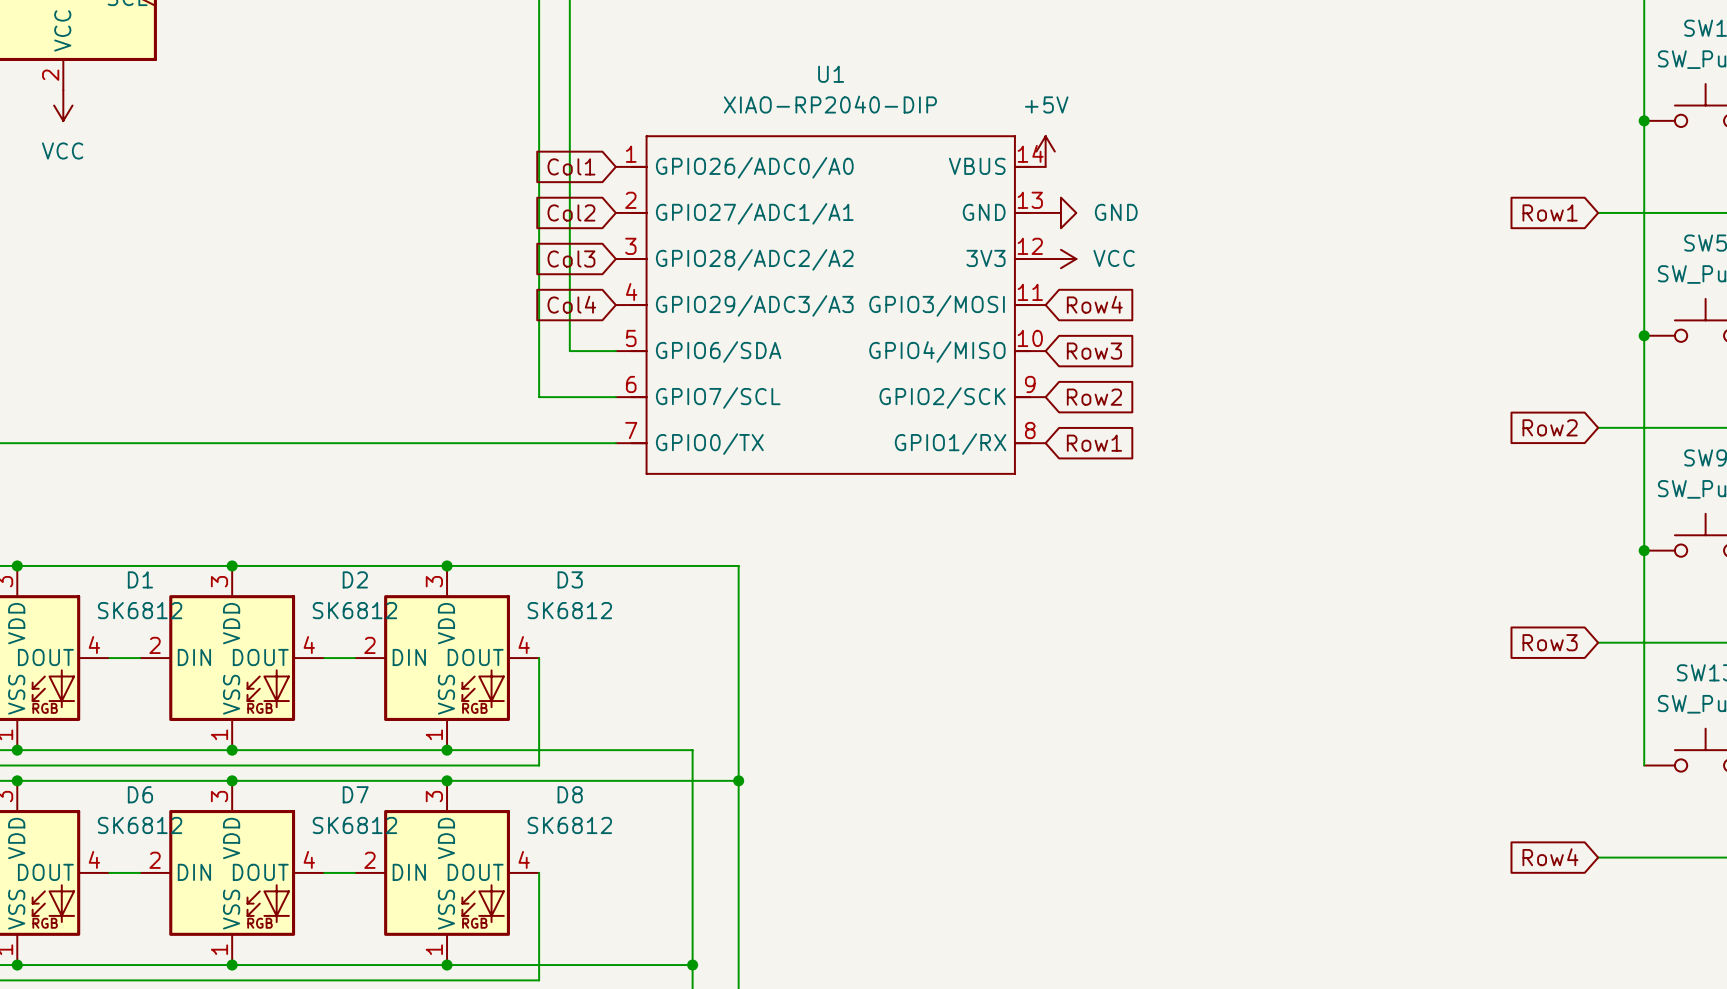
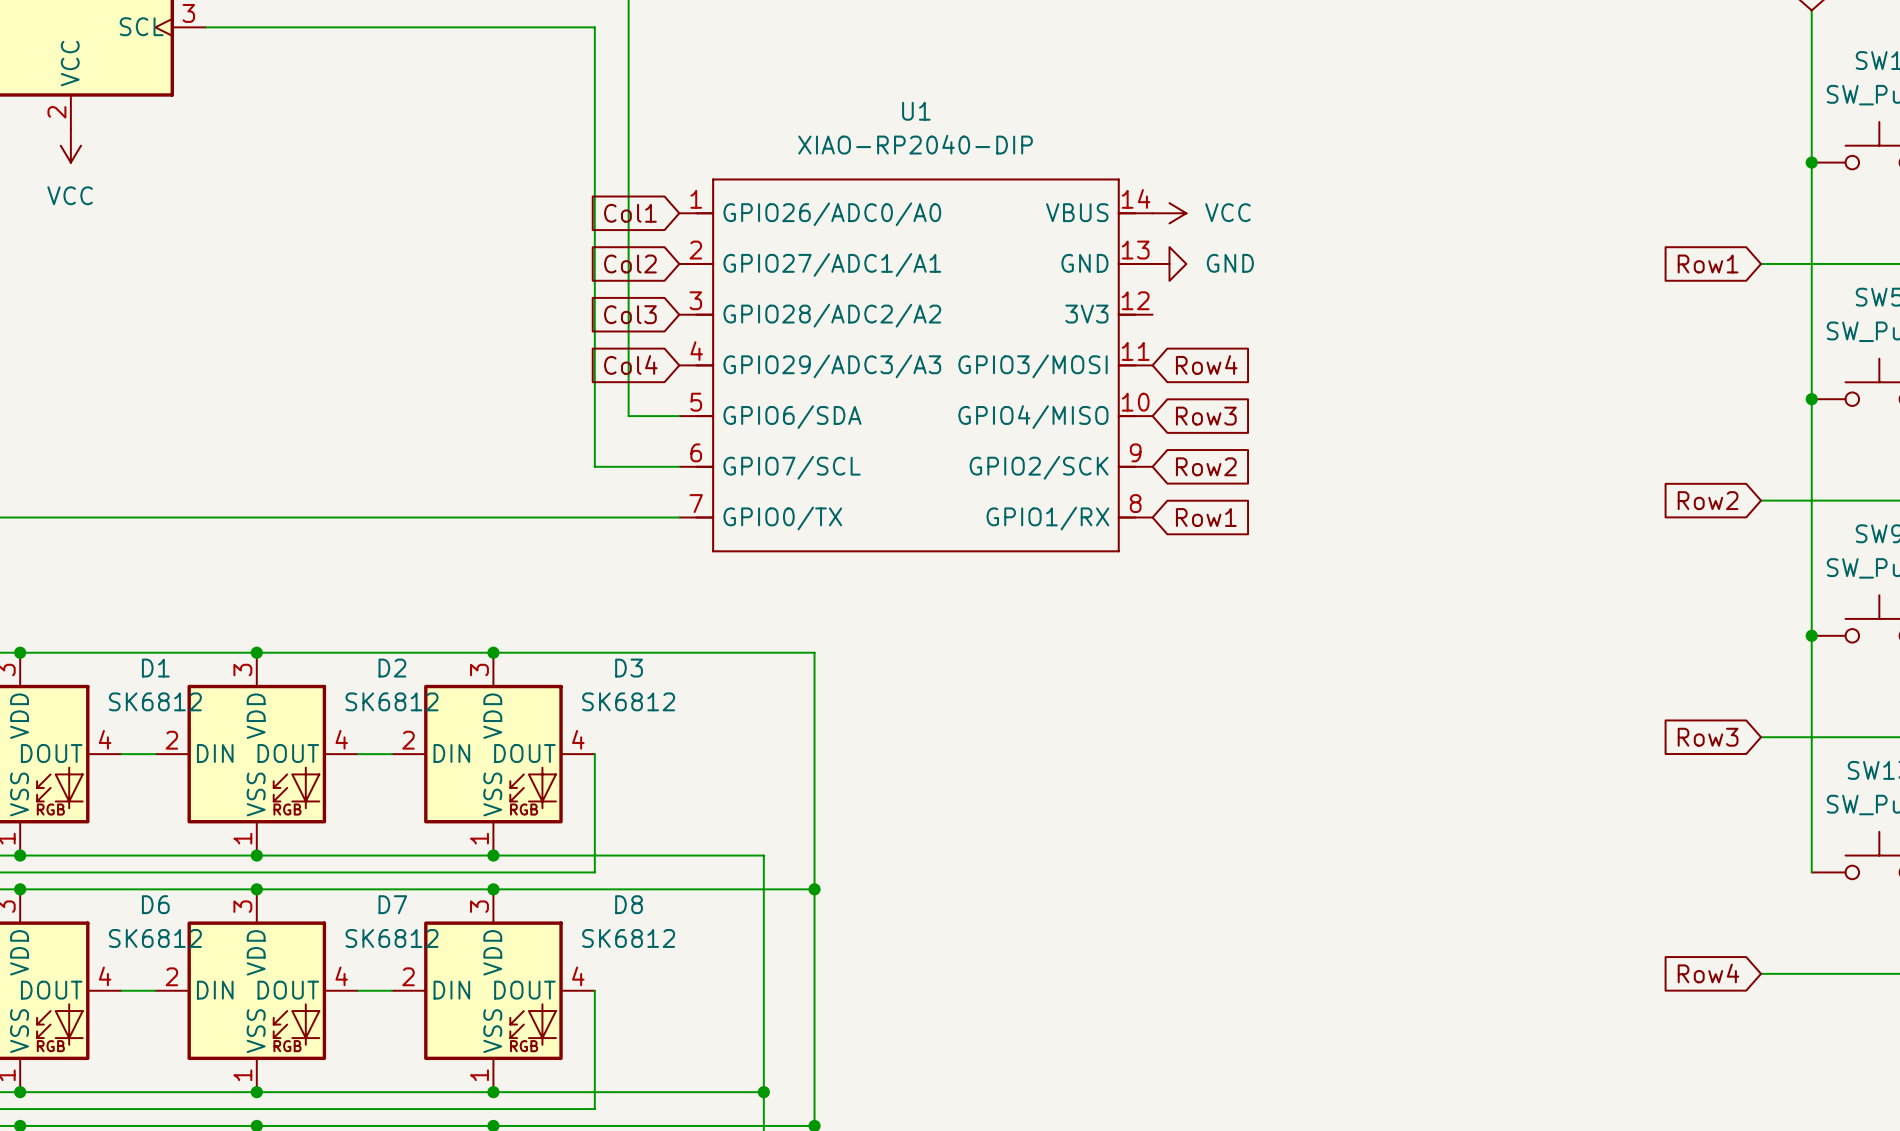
power symbol: +5V (1045, 151) -> none
power symbol position: VCC (1060, 259) -> VCC (1169, 213)

